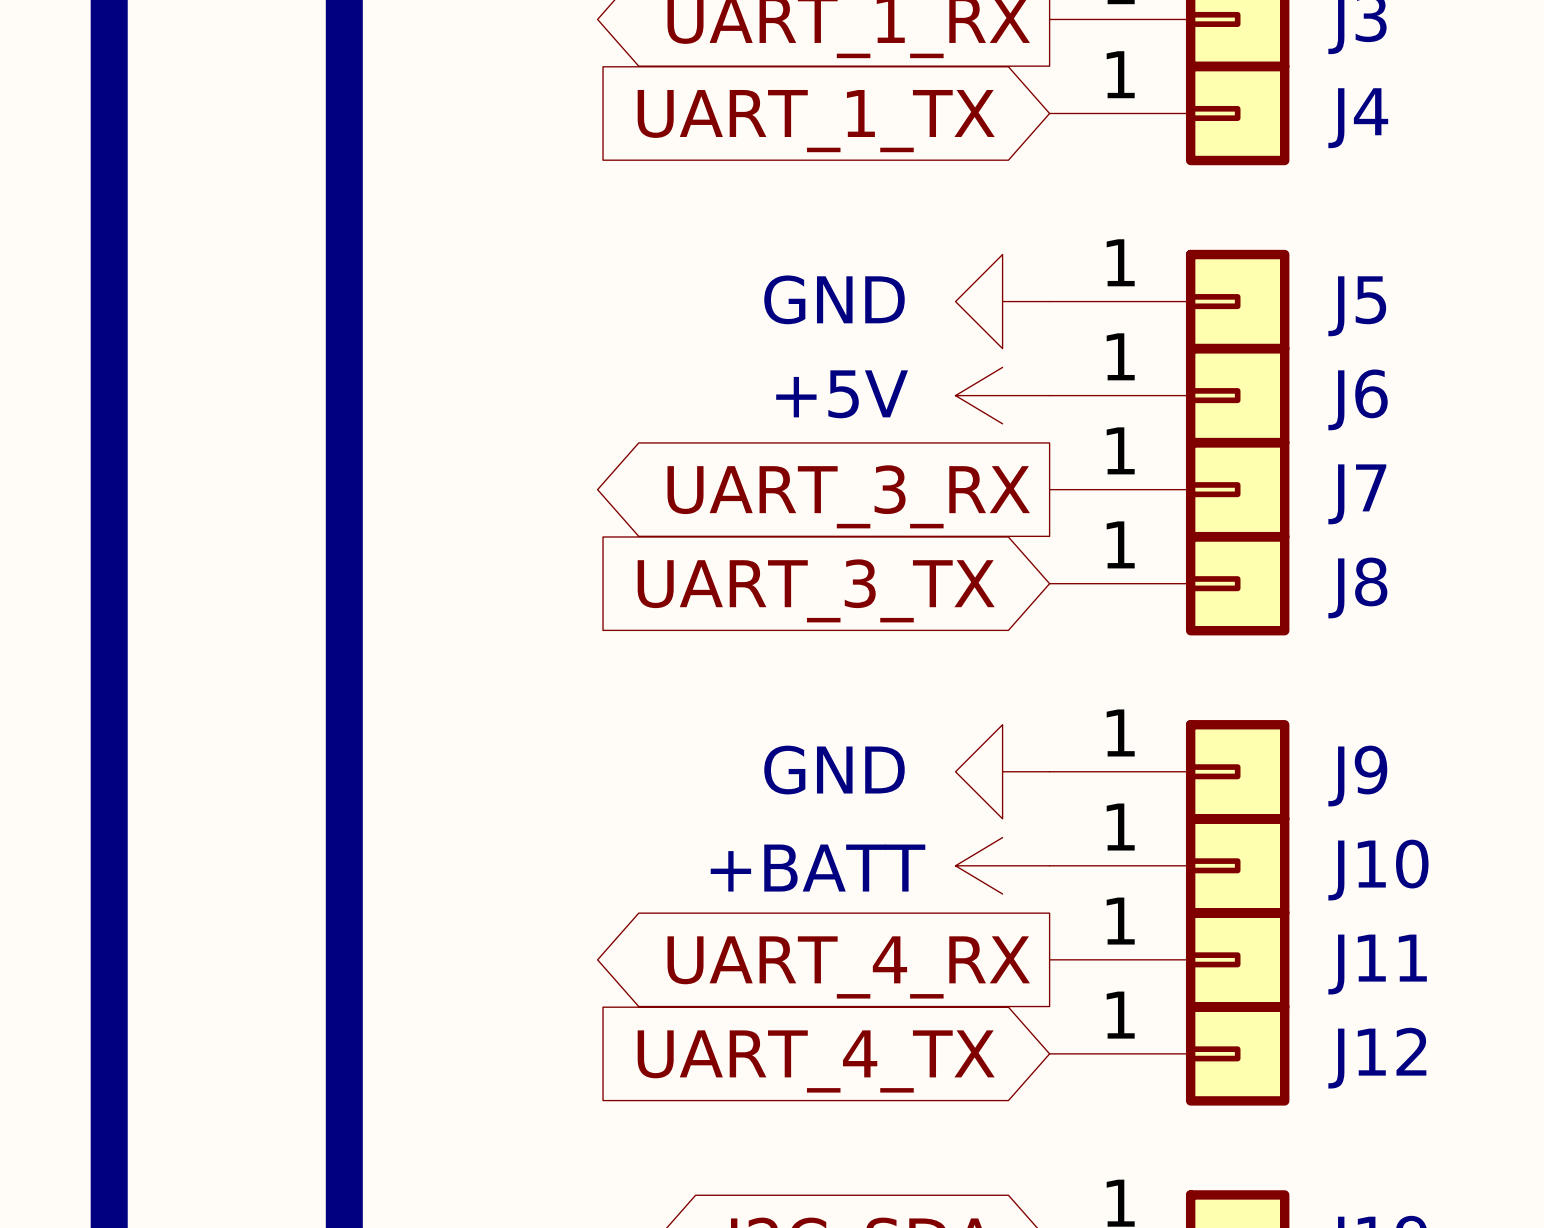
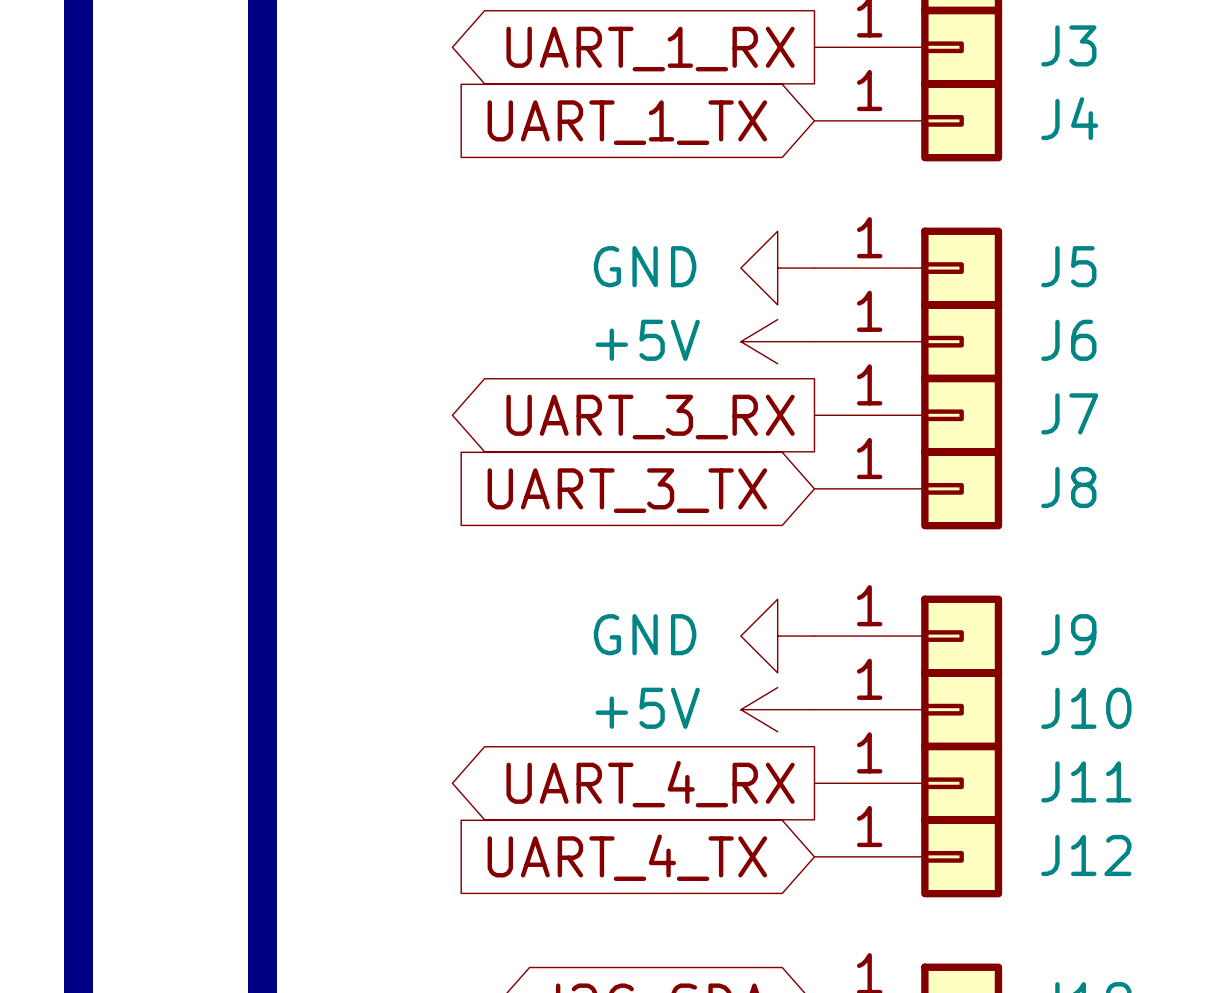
power symbol: +BATT (1002, 865) -> +5V (777, 709)

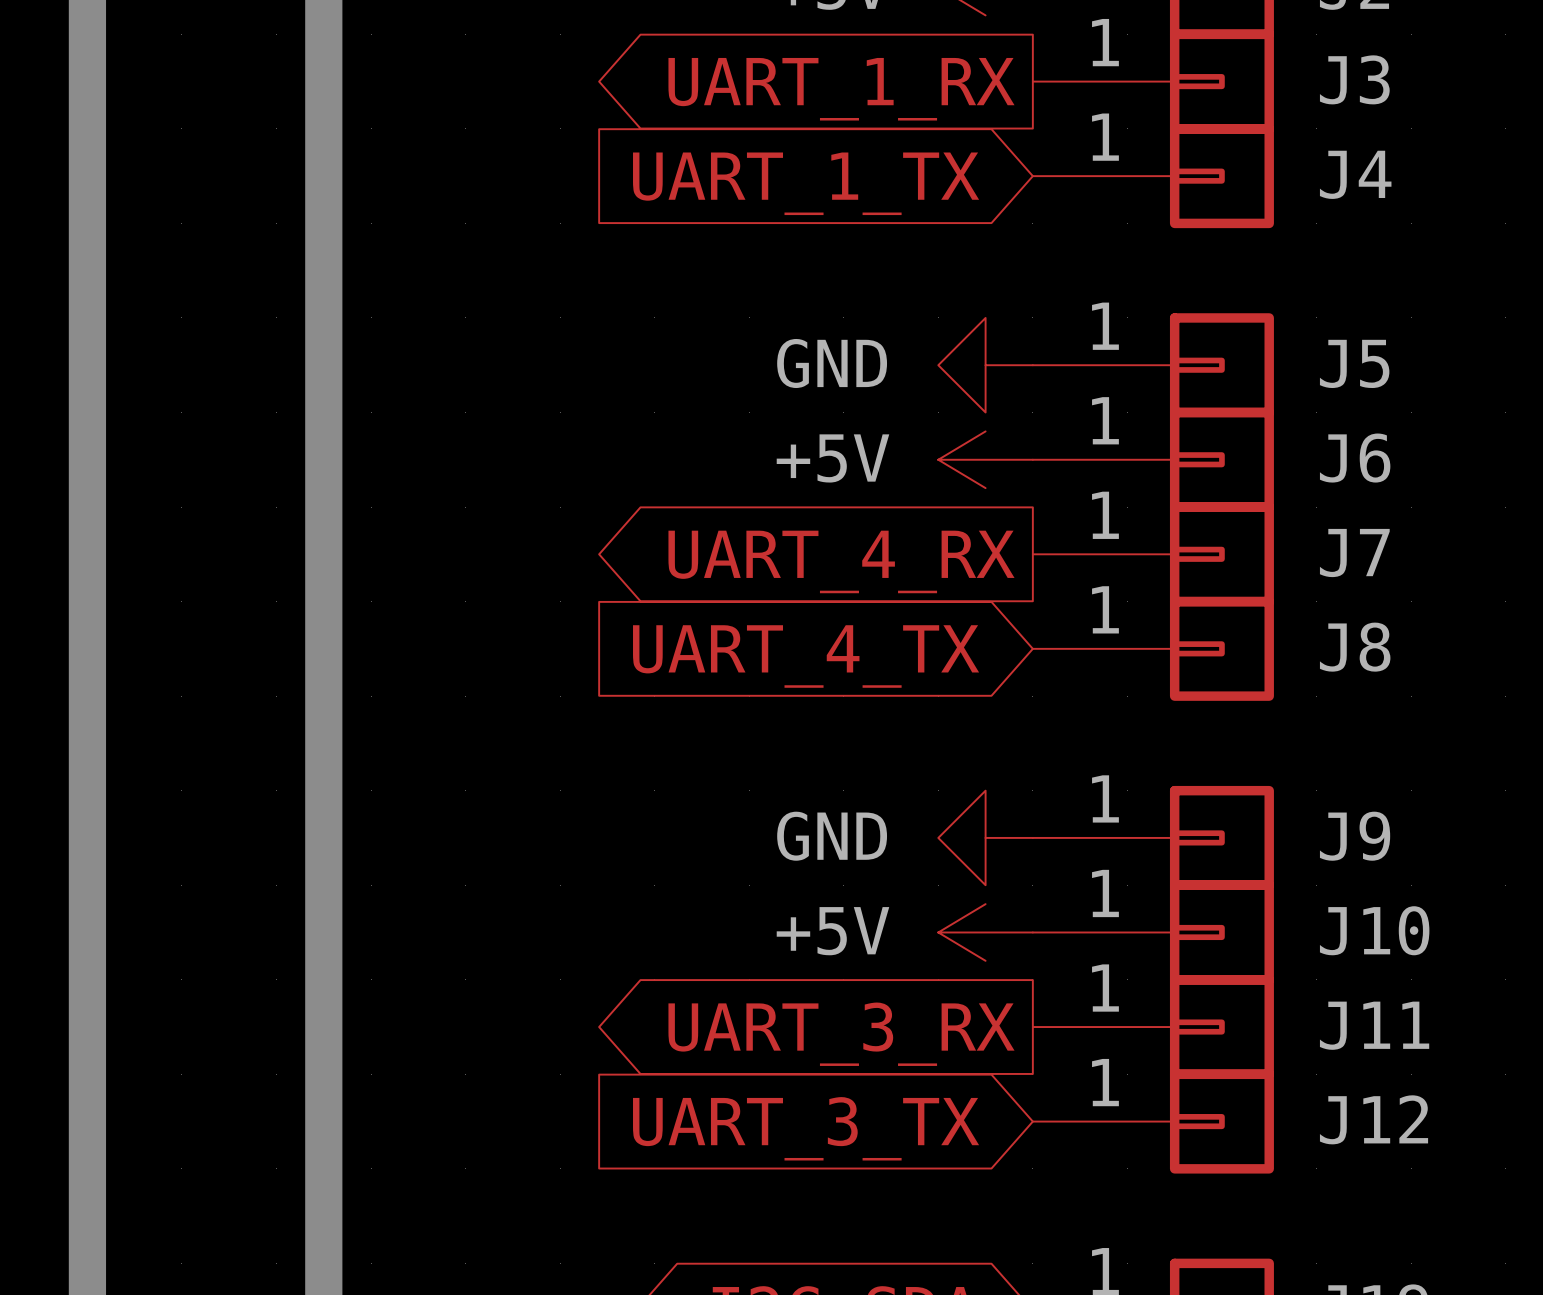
global label: UART_3_RX (650, 417) -> UART_4_RX (841, 561)
global label: UART_3_TX (627, 490) -> UART_4_TX (806, 656)
global label: UART_4_RX (650, 784) -> UART_3_RX (841, 1034)
global label: UART_4_TX (627, 857) -> UART_3_TX (806, 1128)

